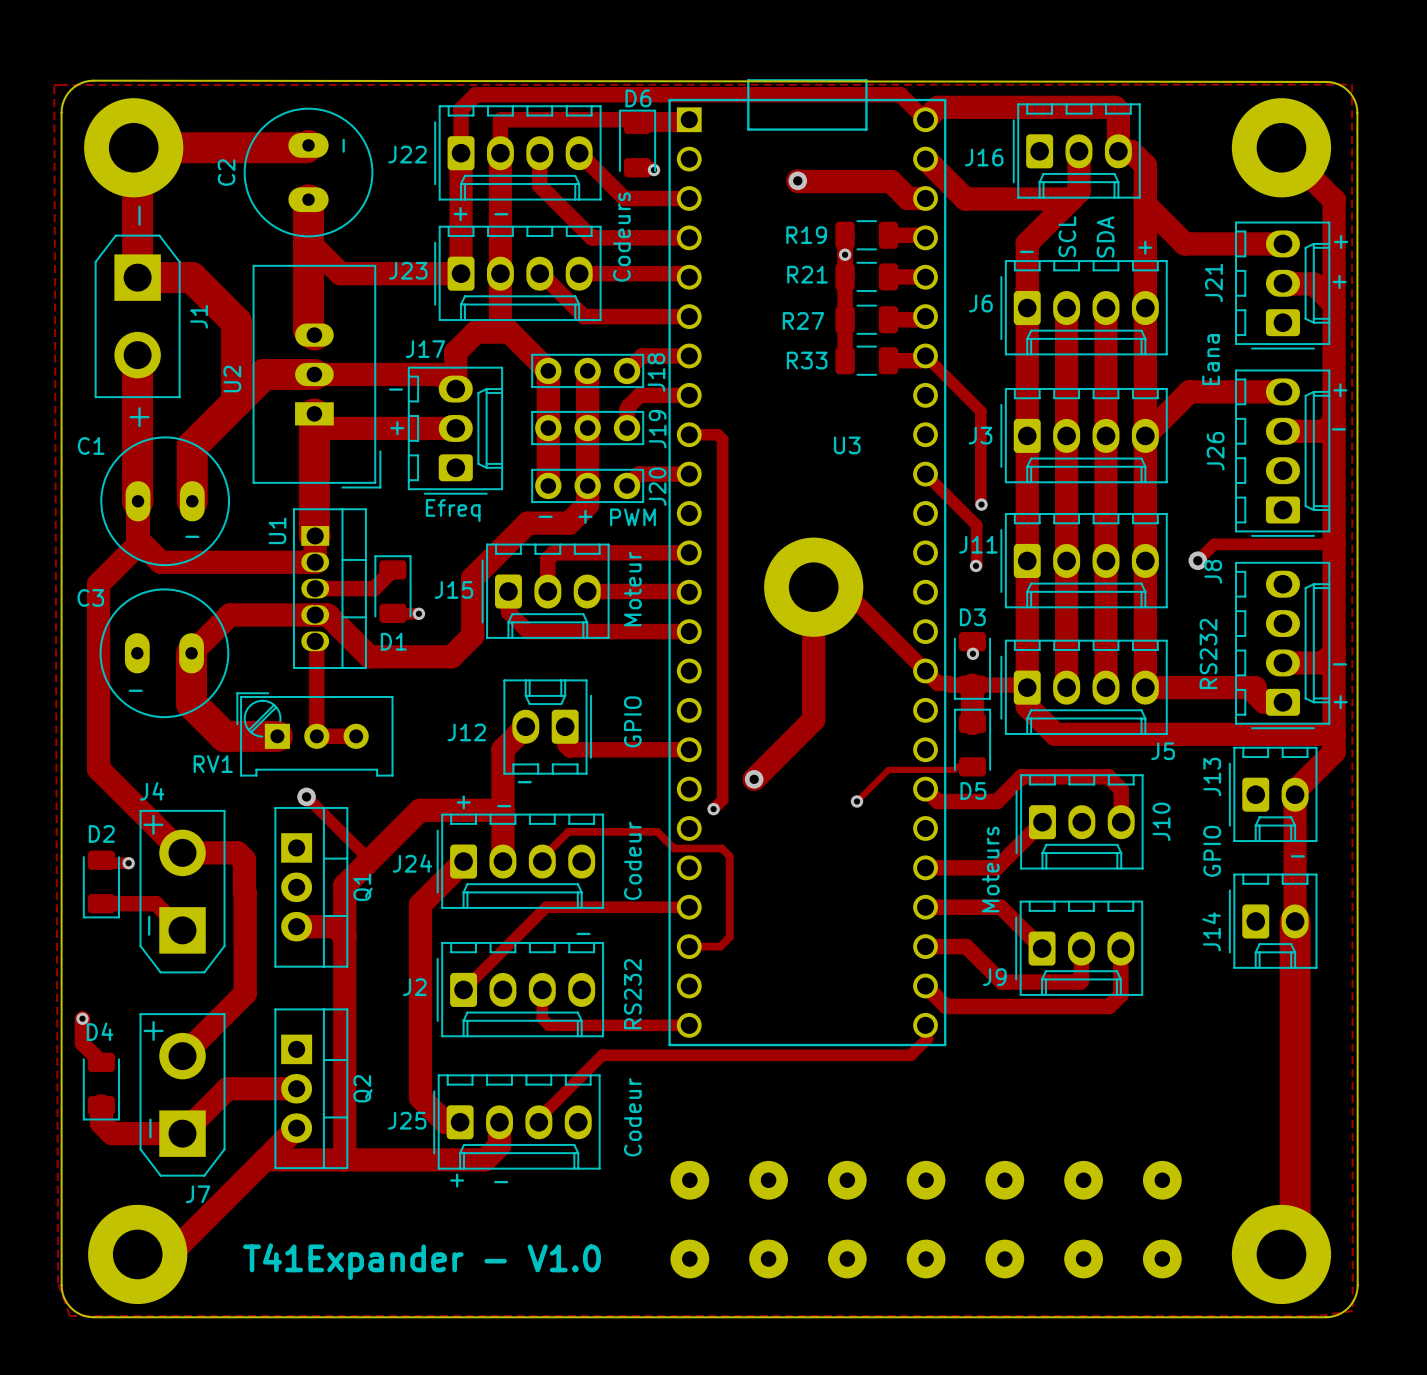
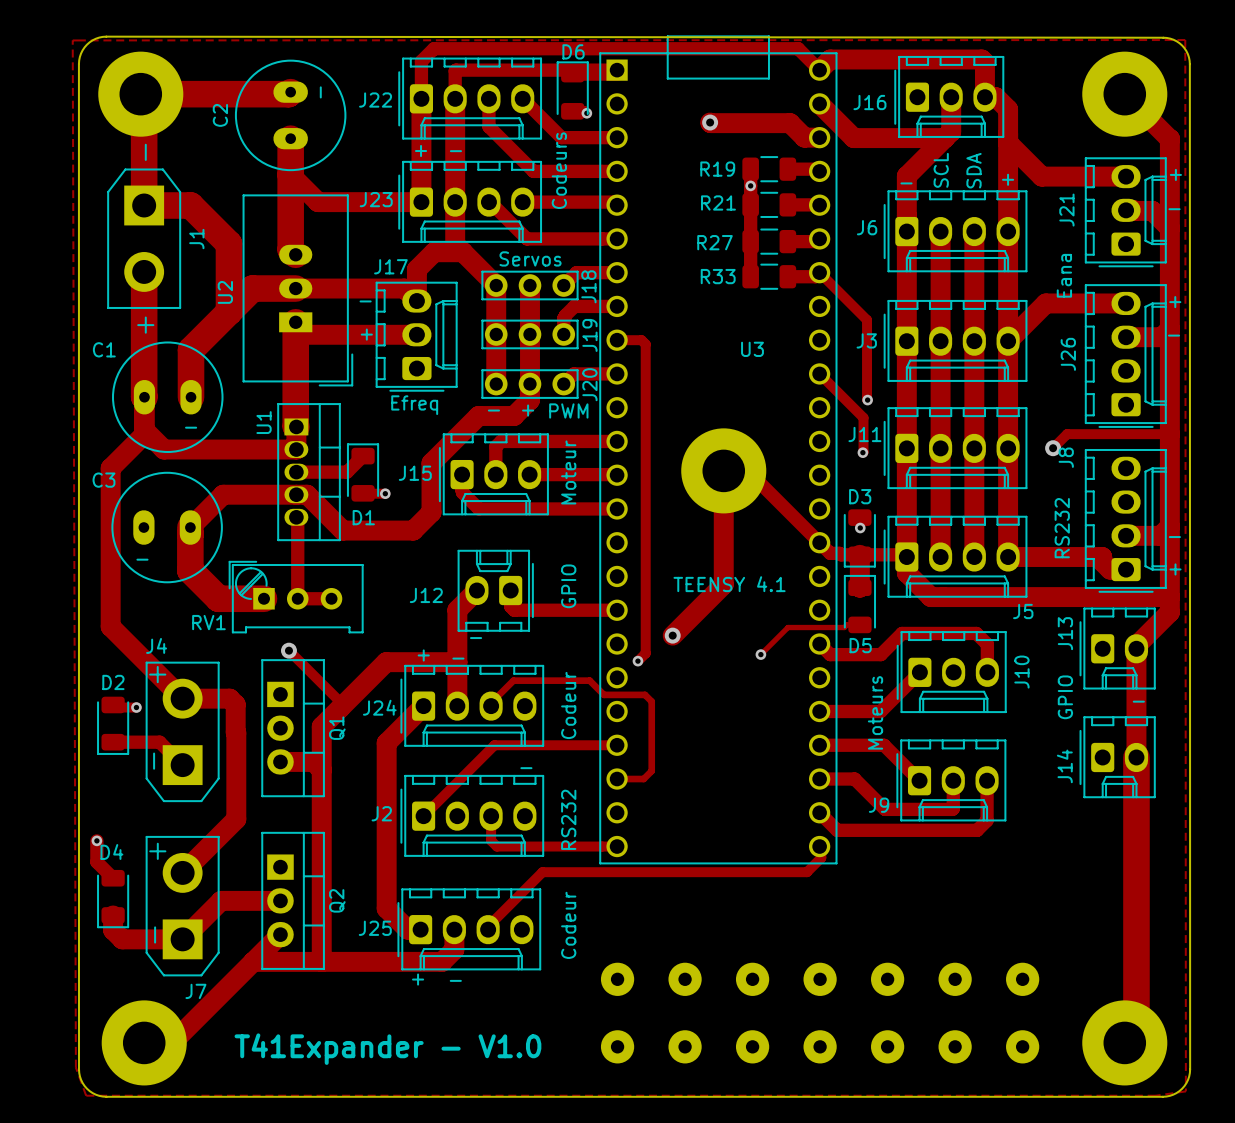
text: + (1339, 281) -> - (1174, 209)
text: none -> Servos (530, 258)
text: none -> TEENSY 4.1 (729, 584)

